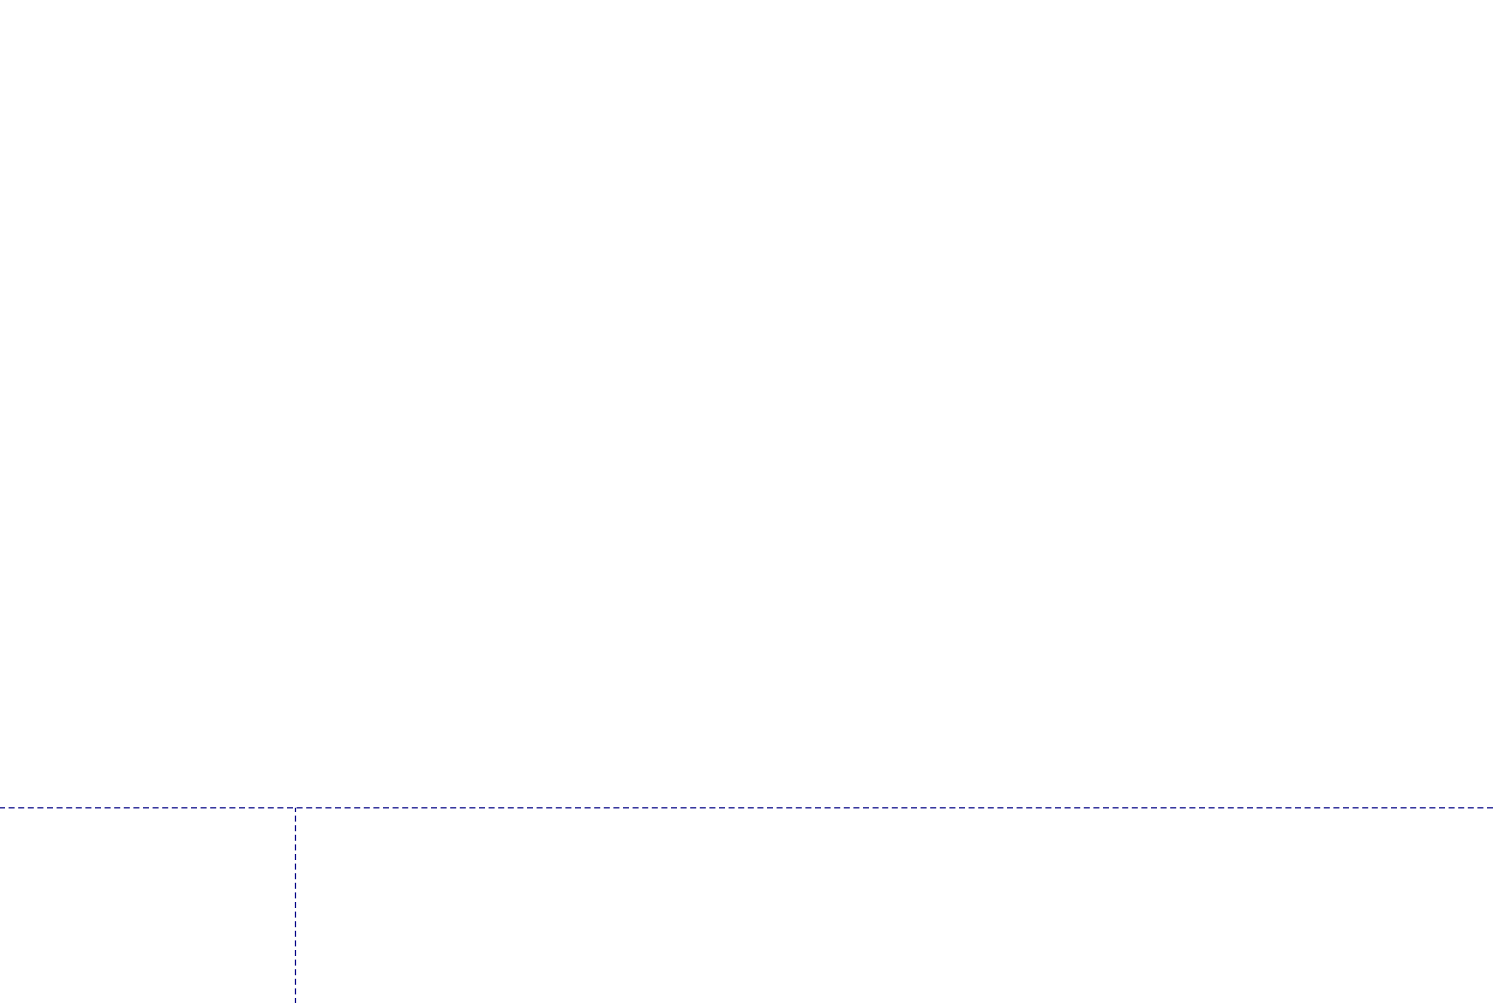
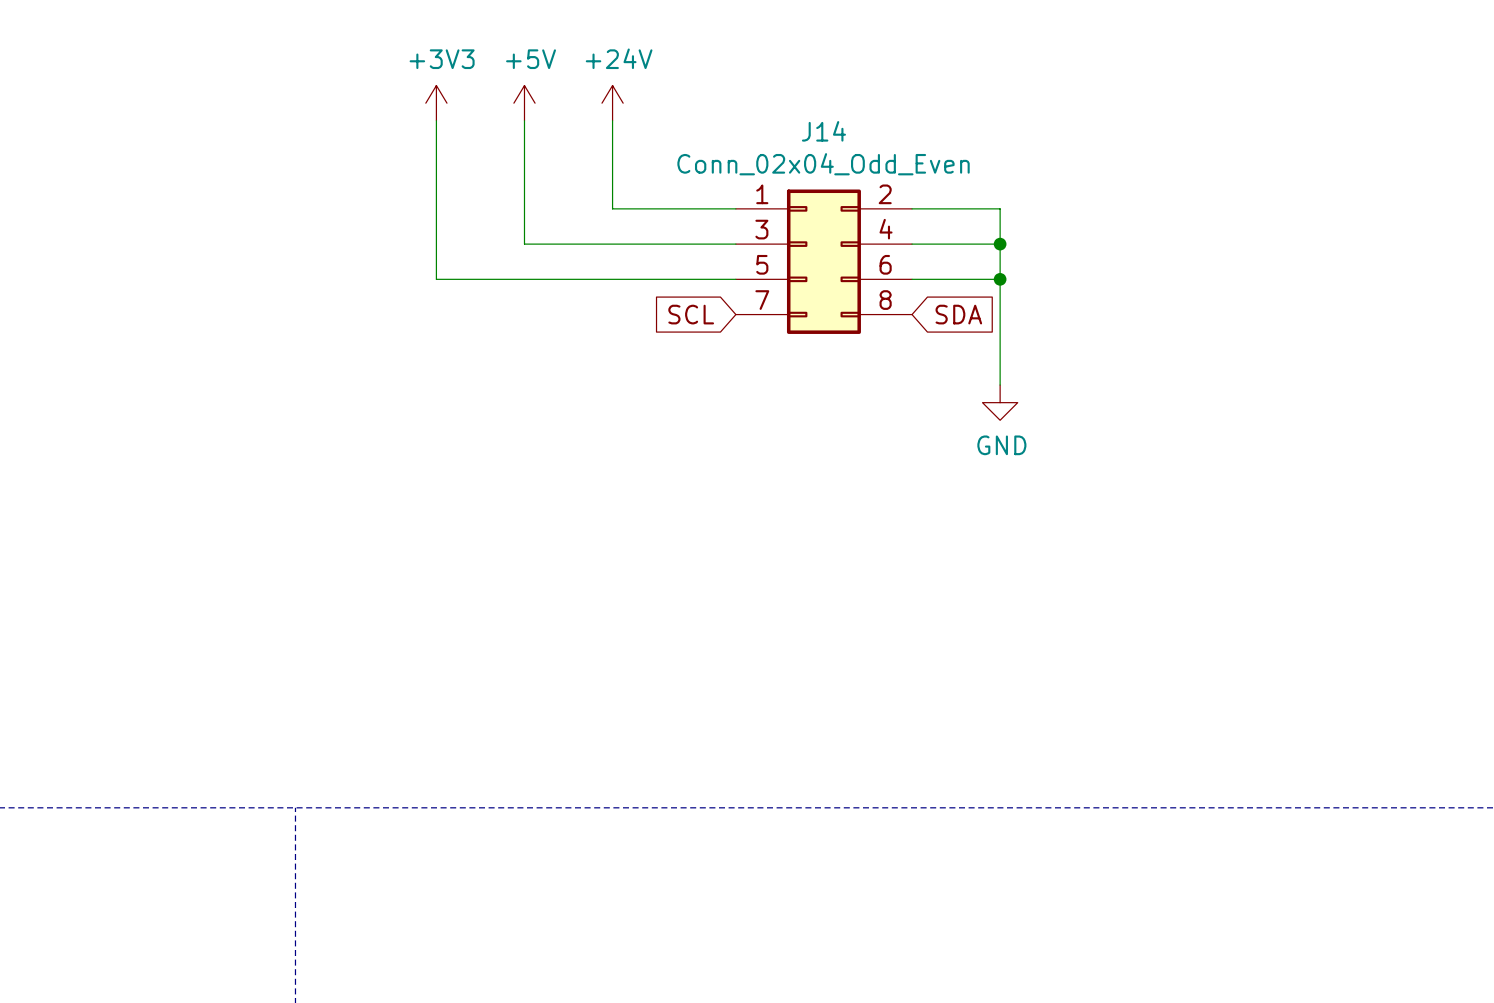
power symbol: none -> +3V3 (436, 103)
power symbol: none -> +5V (524, 103)
power symbol: none -> +24V (612, 103)
wire: none -> (436, 120) (436, 279) (735, 279)
wire: none -> (524, 120) (524, 244) (735, 244)
wire: none -> (612, 120) (612, 208) (735, 208)
wire: none -> (912, 208) (1000, 208) (1000, 385)
wire: none -> (912, 244) (1000, 244)
junction: none -> (1000, 244)
J14: none -> Conn_02x04_Odd_Even (823, 261)
wire: none -> (912, 279) (1000, 279)
junction: none -> (1000, 279)
global label: none -> SCL (691, 314)
global label: none -> SDA (958, 314)
power symbol: none -> GND (1000, 402)

